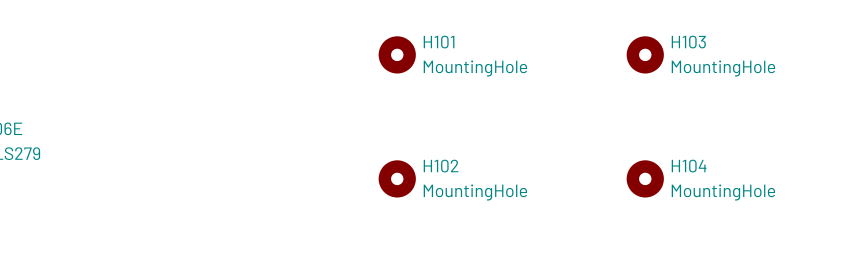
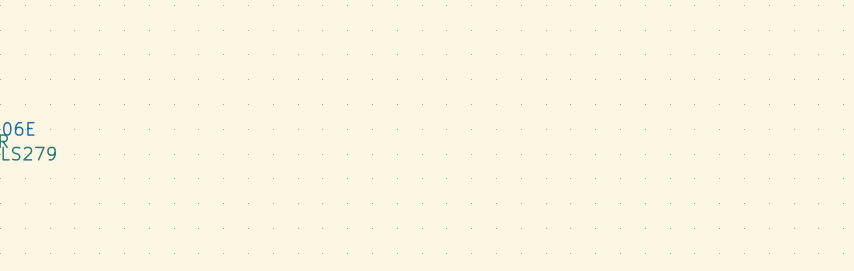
H101: MountingHole (397, 54) -> none
H103: MountingHole (645, 54) -> none
H102: MountingHole (397, 178) -> none
H104: MountingHole (645, 178) -> none

